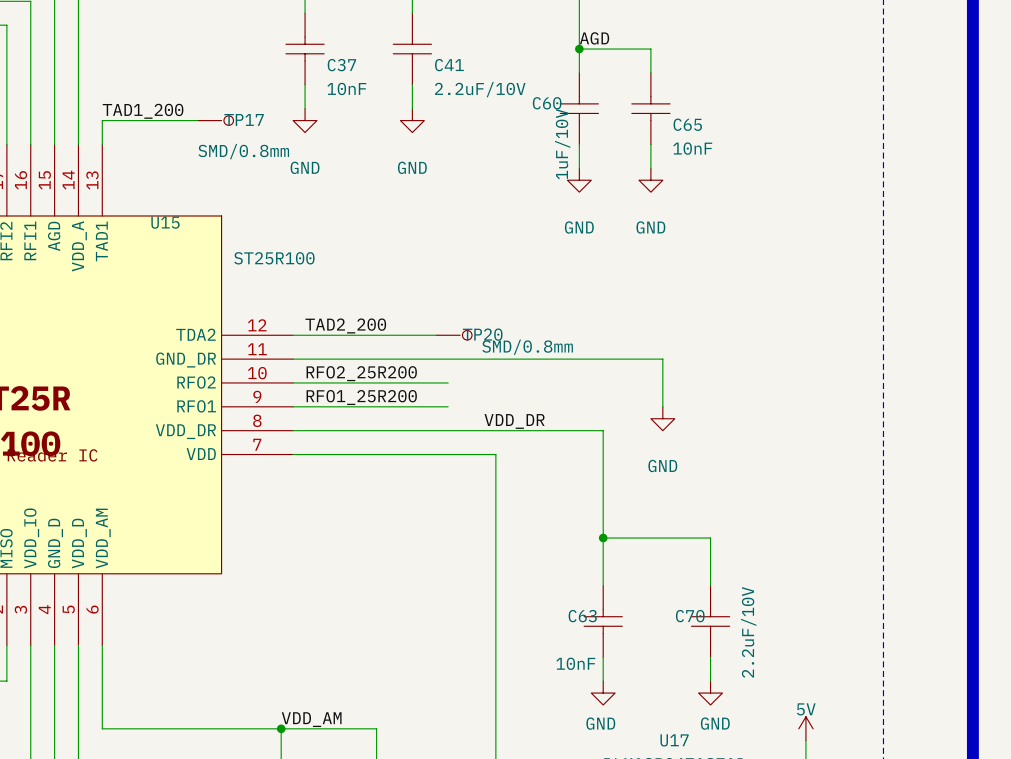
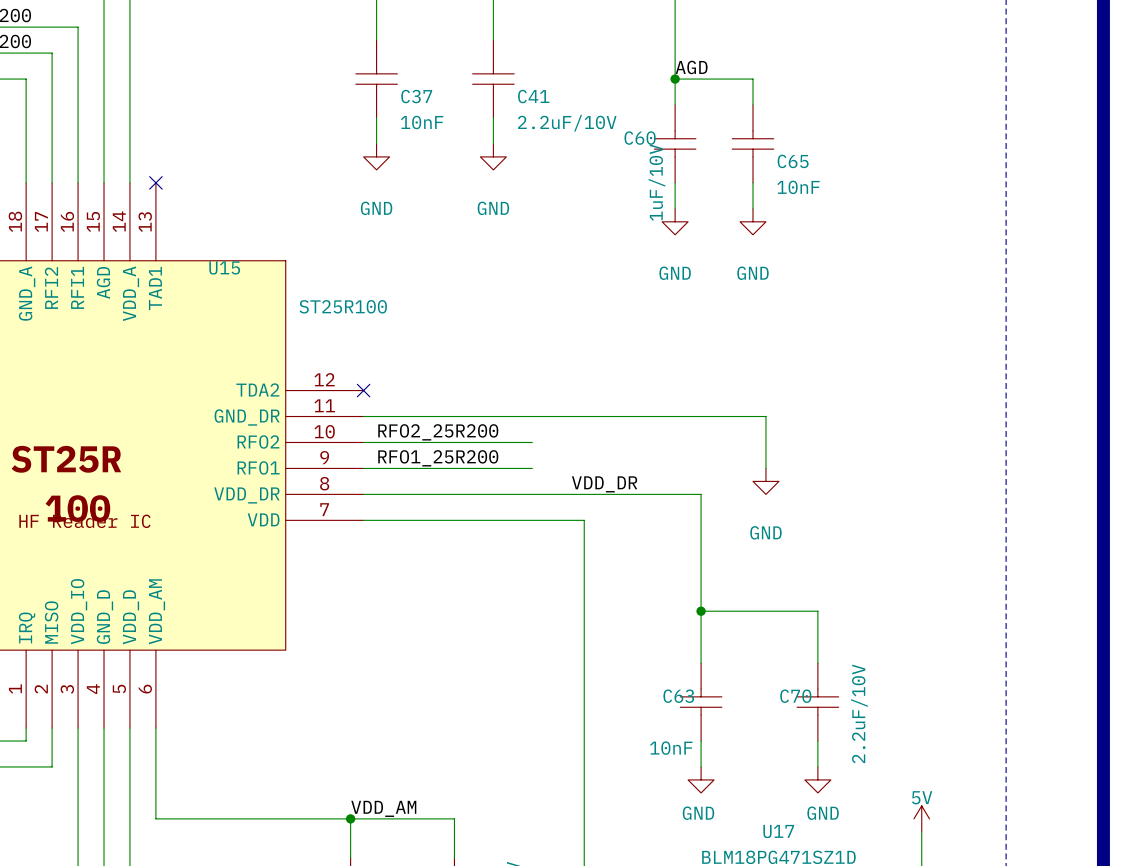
label: TAD1_200 (143, 111) -> none
wire: (197, 120) (102, 120) (102, 144) -> none
TP17: SMD/0.8mm (215, 120) -> none
no-connect mark: none -> (155, 182)
label: TAD2_200 (345, 325) -> none
wire: (293, 335) (436, 335) -> none
no-connect mark: none -> (363, 390)
TP20: SMD/0.8mm (454, 335) -> none

